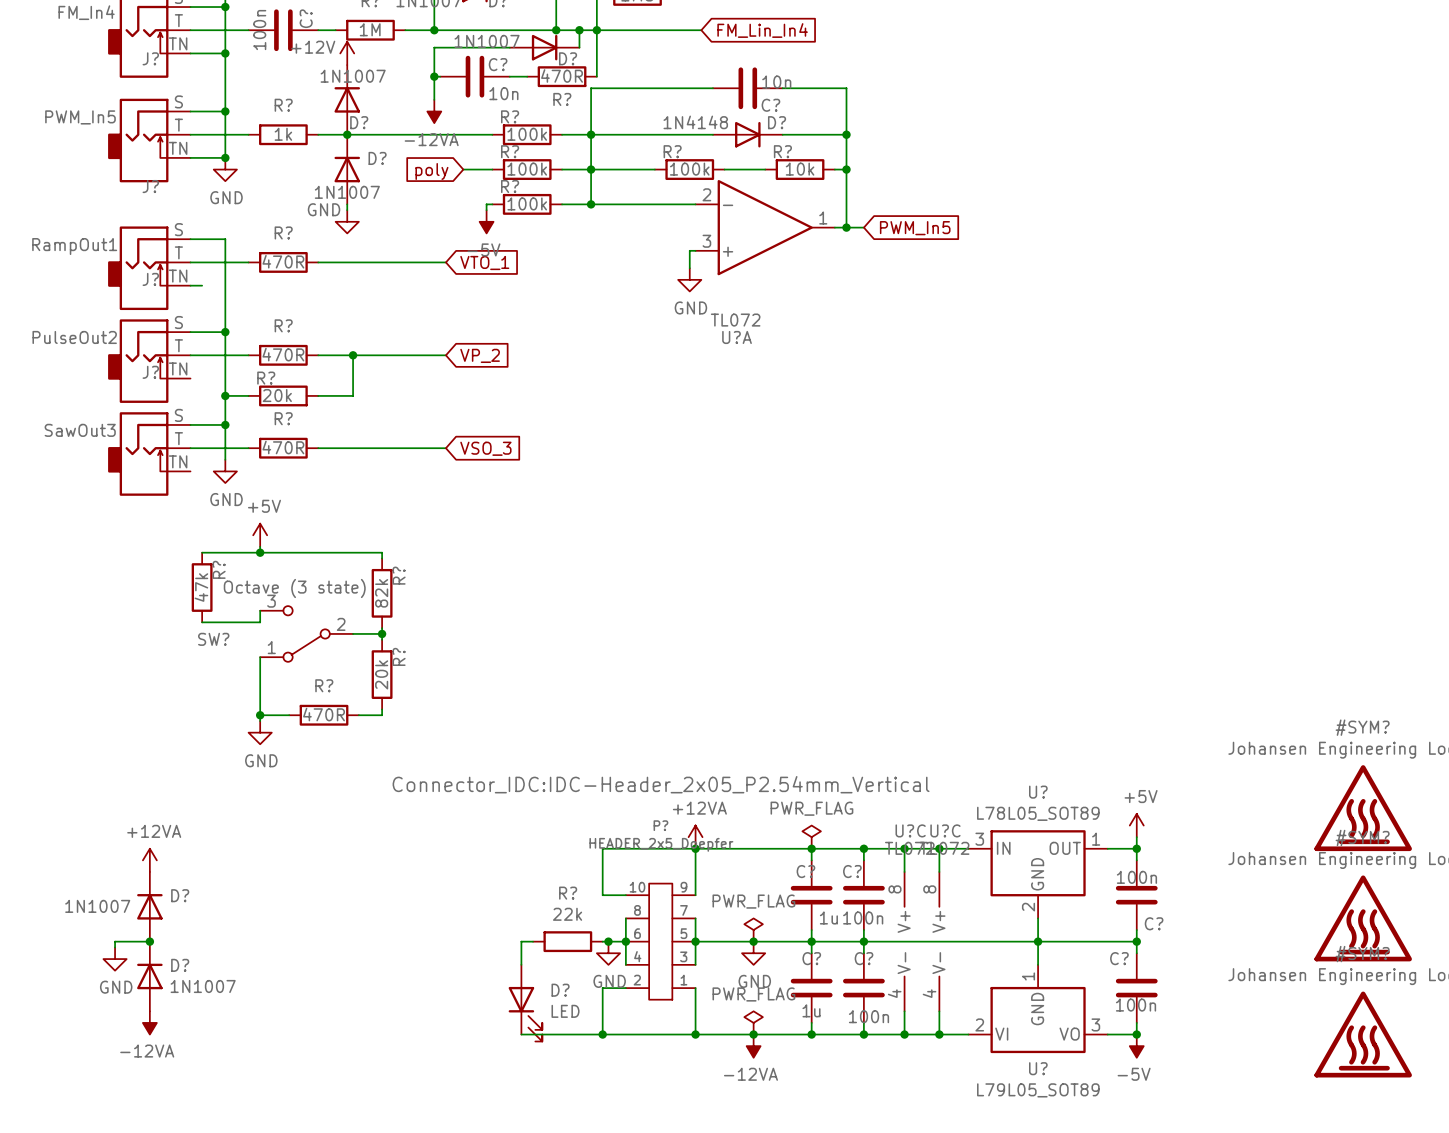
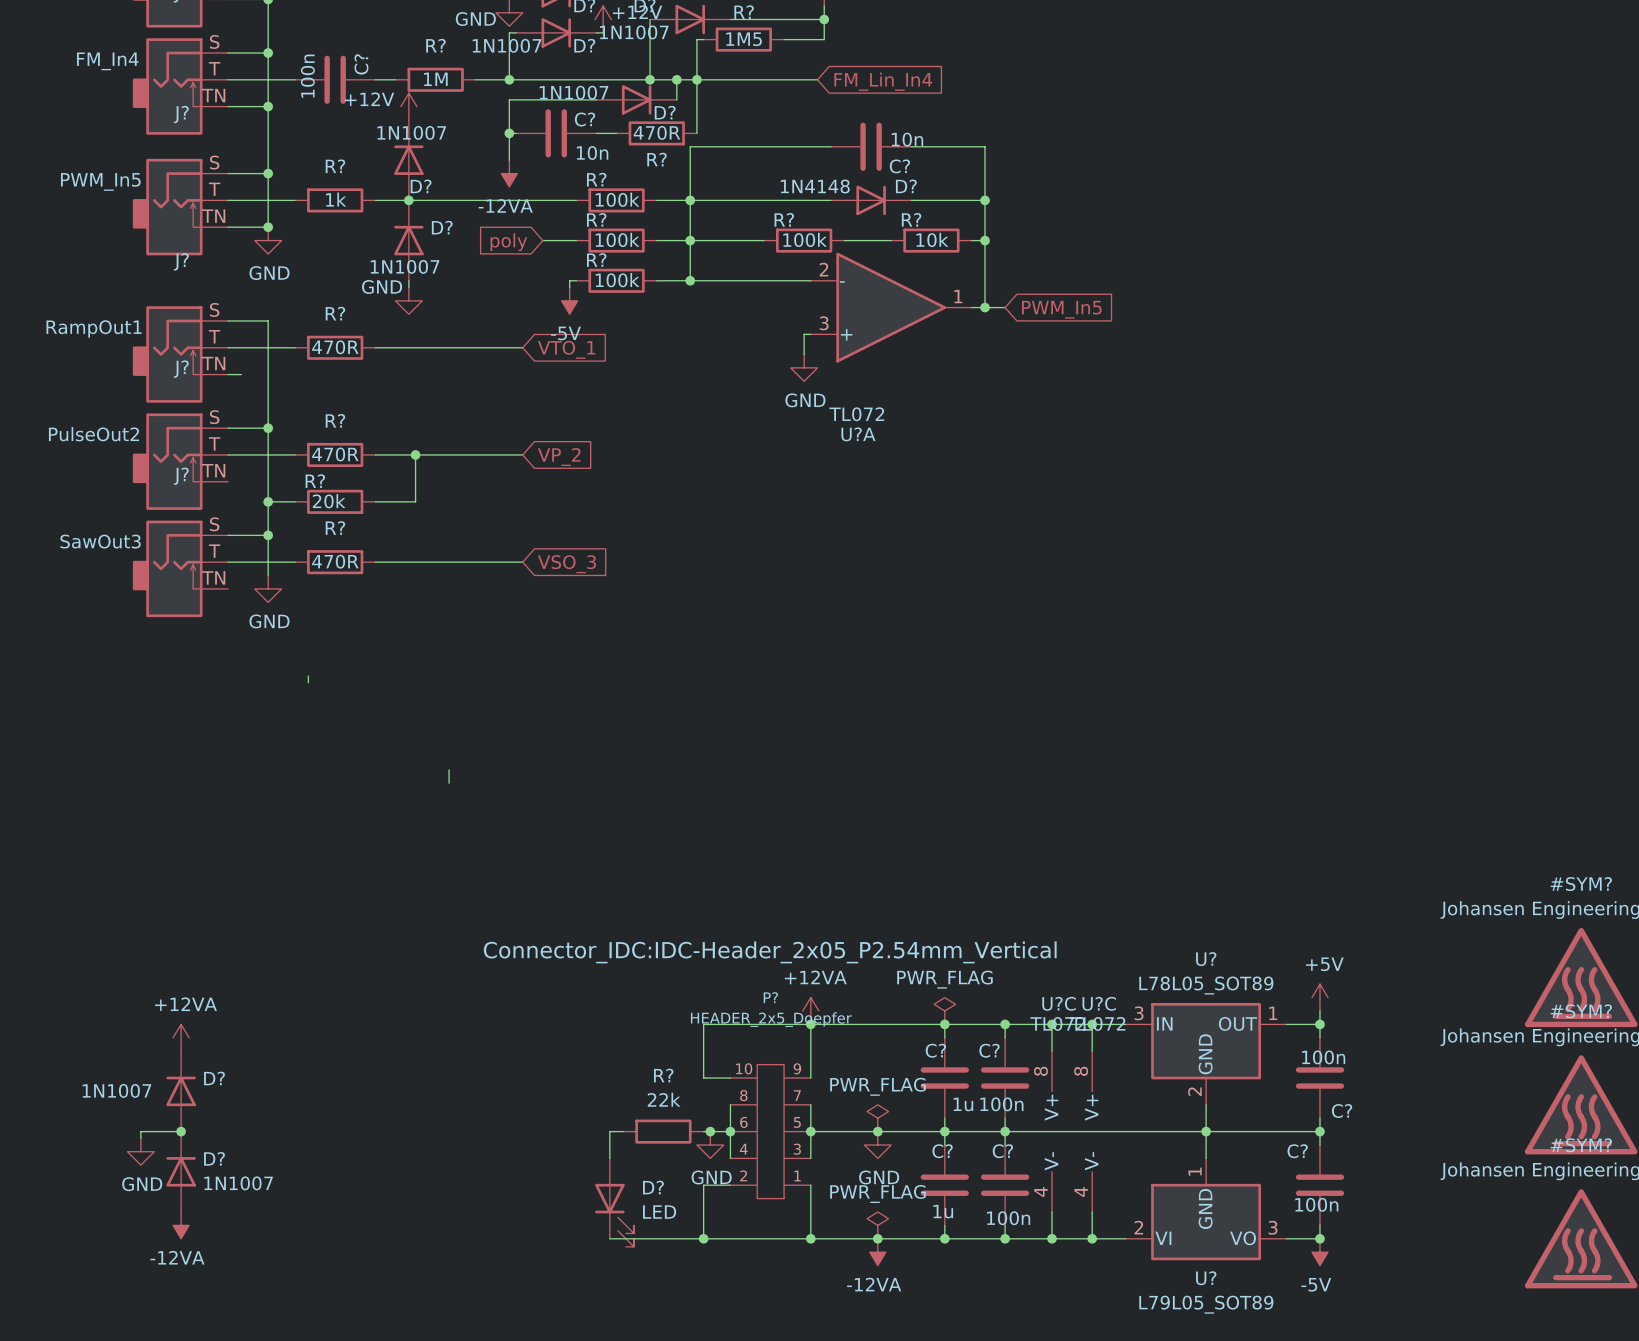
power symbol: +5V (260, 535) -> none
wire: (202, 552) (382, 552) (382, 558) -> none
junction: (260, 552) -> none
R?: 47k (202, 587) -> none
R?: 82k (382, 593) -> none
wire: (260, 610) (260, 622) (202, 622) -> none
SW?: Octave (3 state) (306, 633) -> none
wire: (353, 633) (382, 633) -> none
junction: (382, 633) -> none
wire: (260, 657) (260, 721) -> none
R?: 20k (382, 674) -> none
wire: (382, 709) (382, 715) (358, 715) -> none
wire: (260, 715) (289, 715) -> none
junction: (260, 715) -> none
R?: 470R (324, 715) -> none
power symbol: GND (260, 732) -> none

